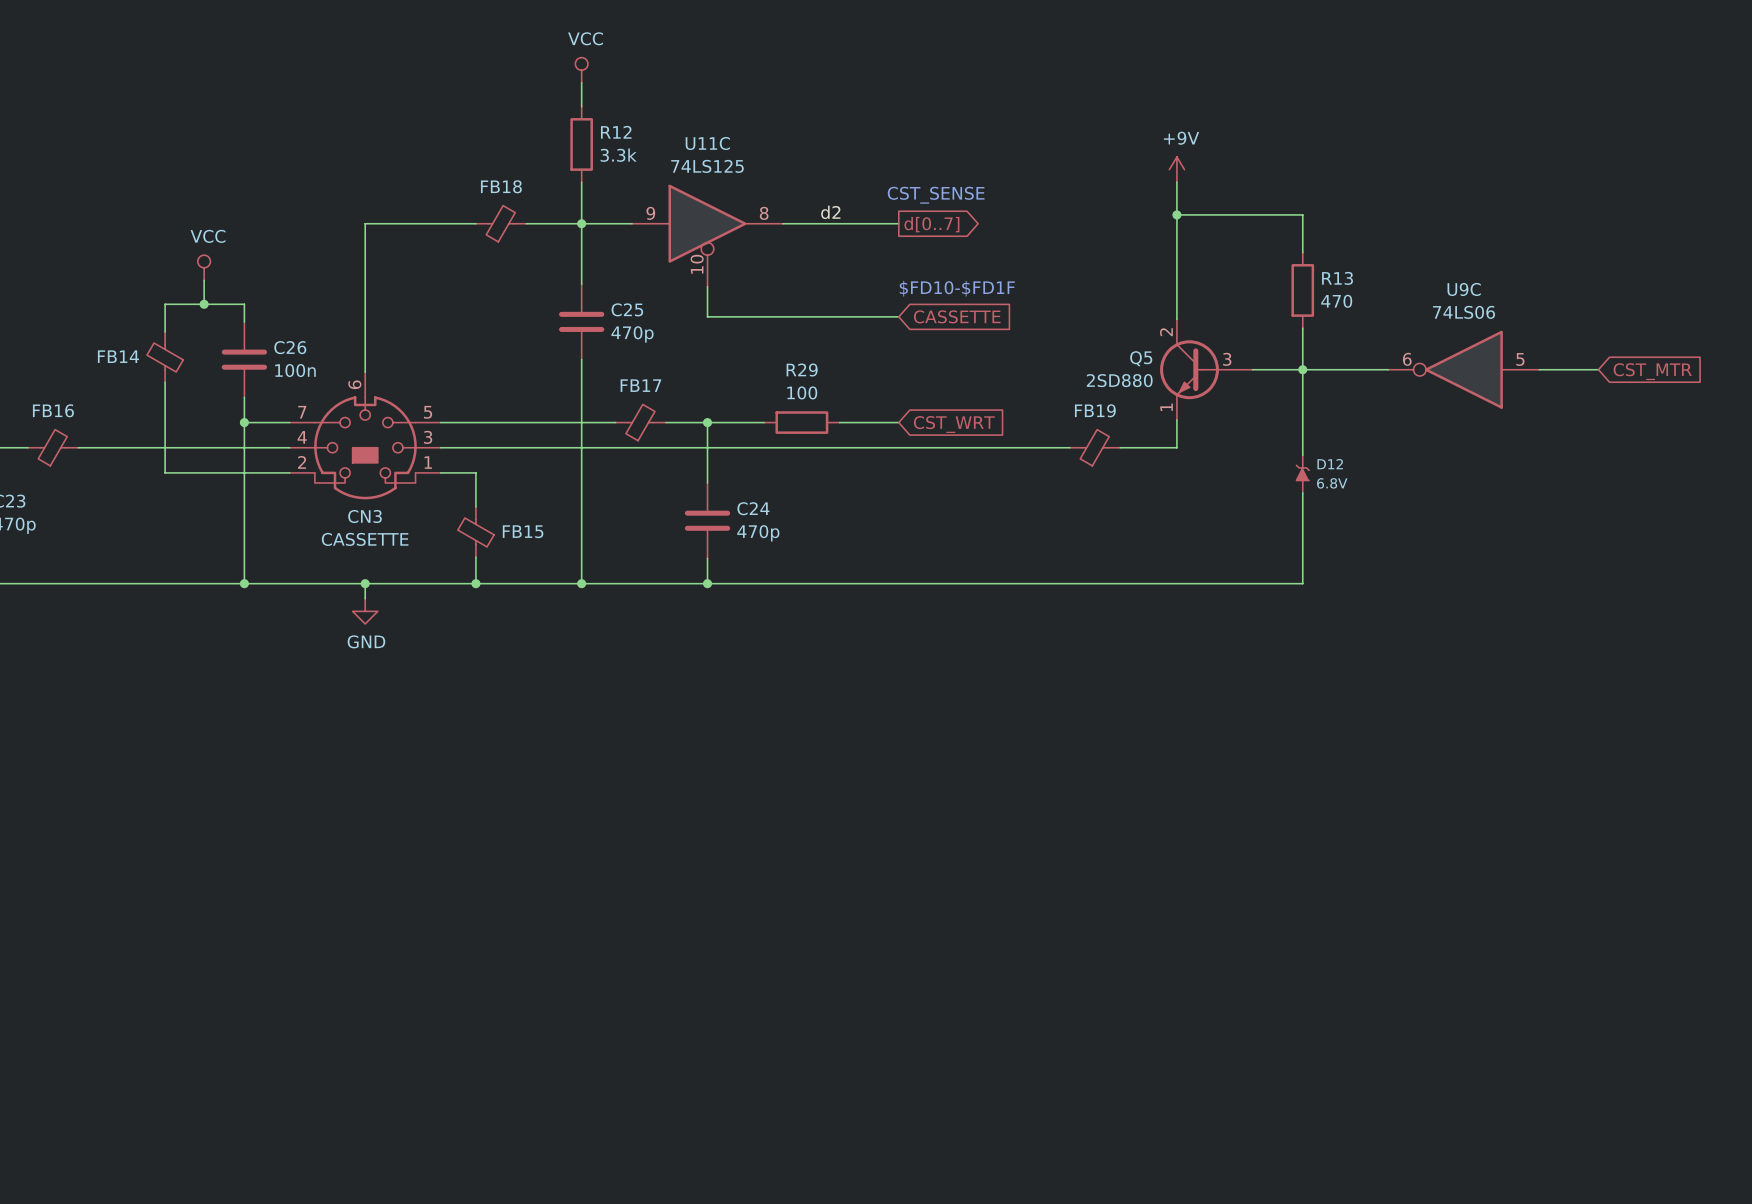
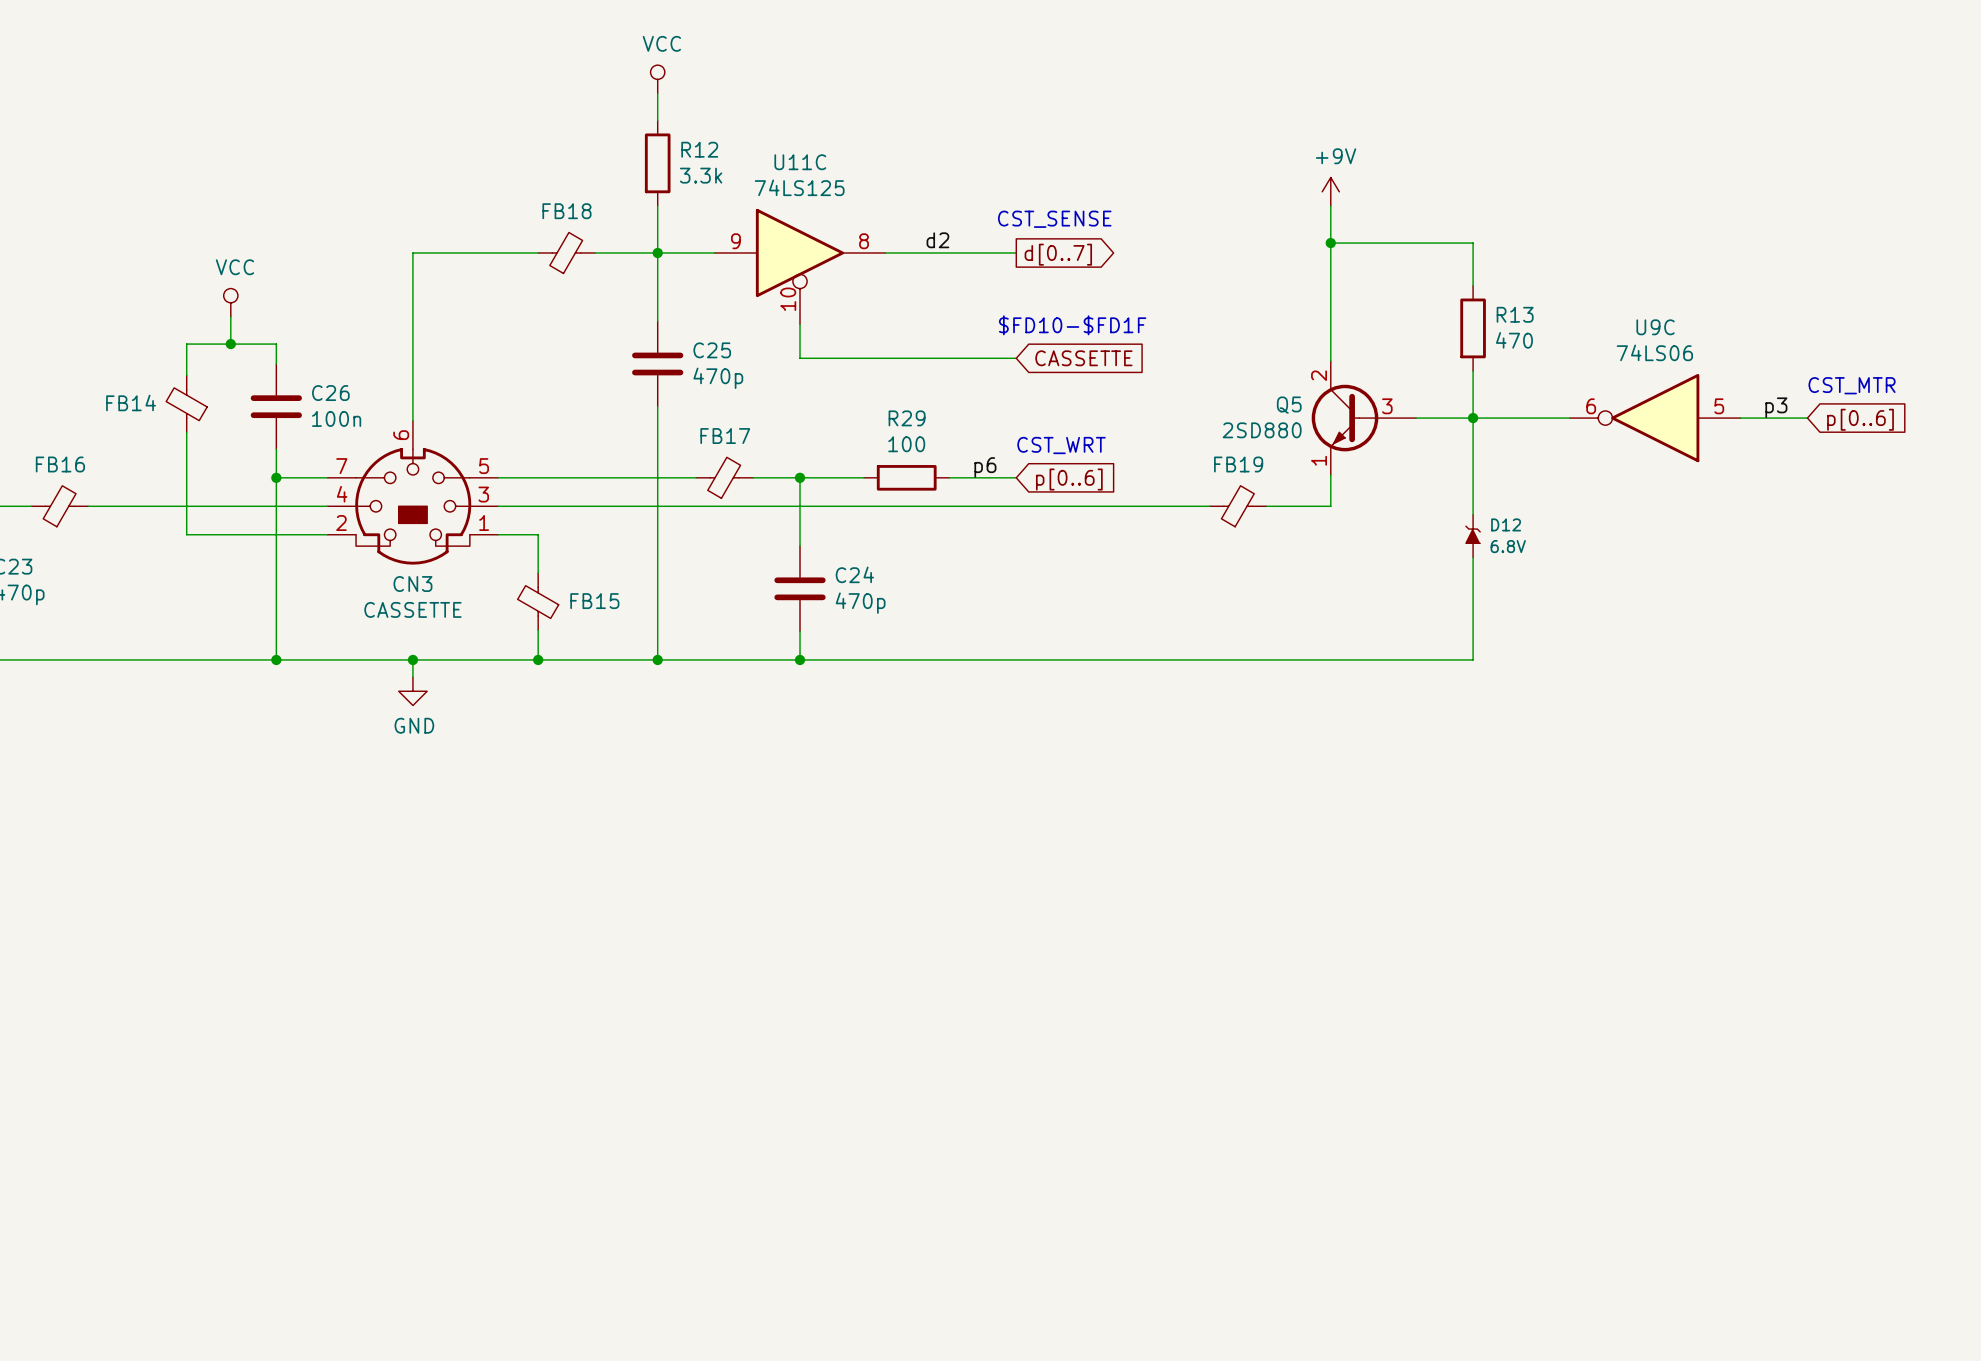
text: none -> CST_MTR (1852, 385)
label: none -> p3 (1776, 407)
global label: CST_MTR (1652, 371) -> p[0..6] (1860, 419)
text: none -> CST_WRT (1061, 445)
label: none -> p6 (985, 467)
global label: CST_WRT (954, 424) -> p[0..6] (1069, 479)

